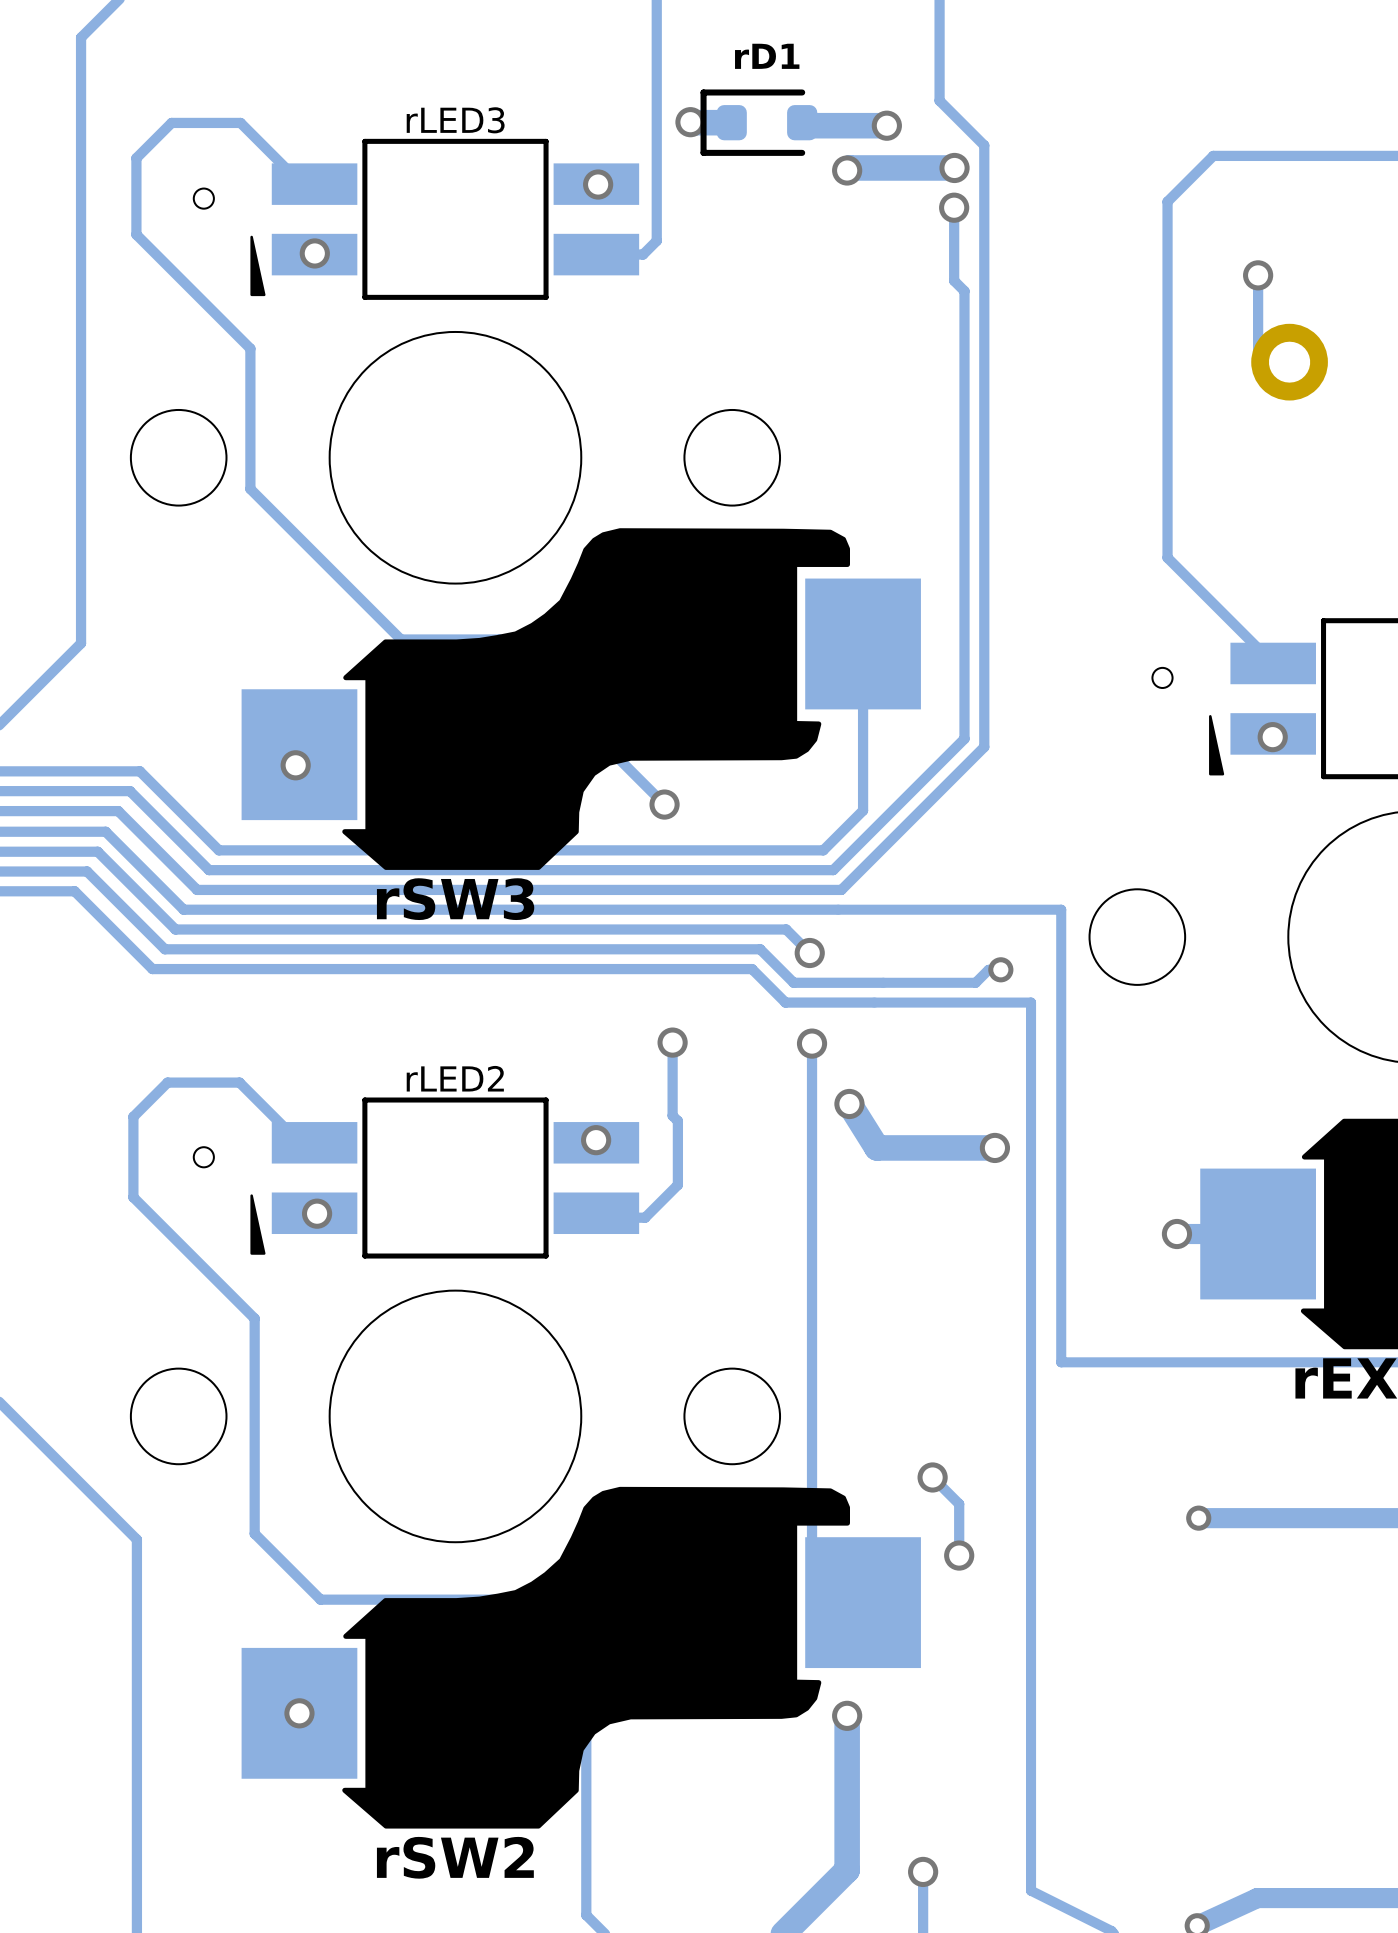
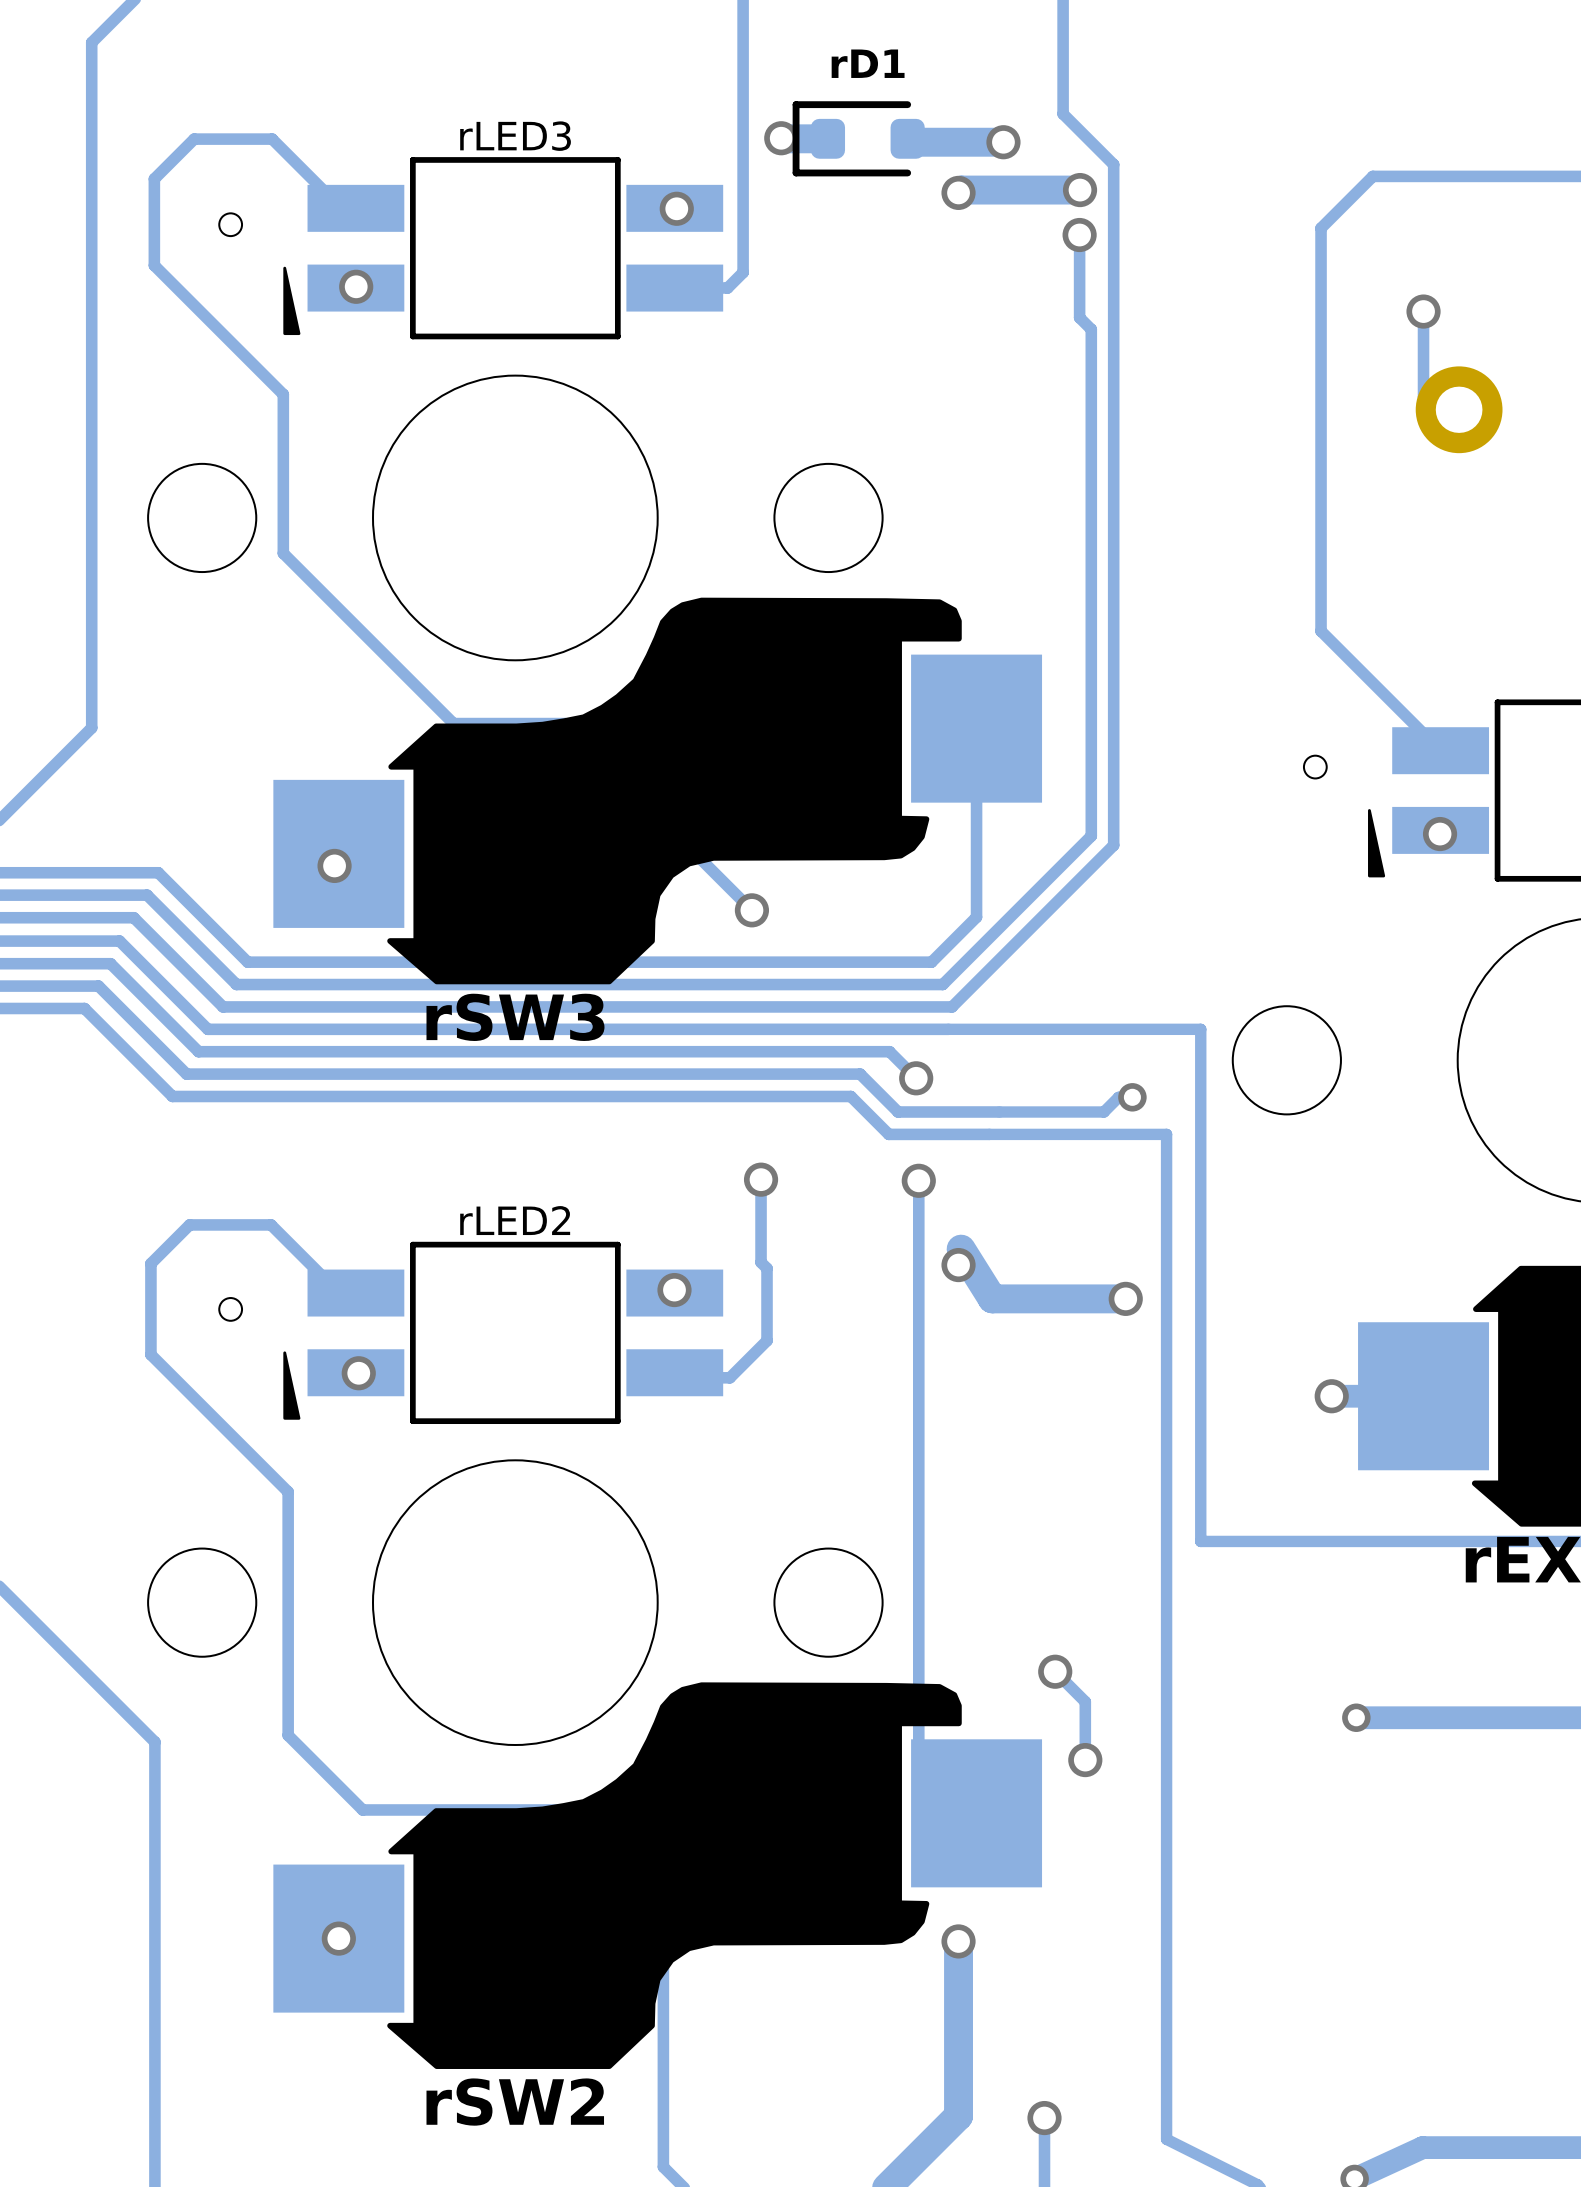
via position: (849, 1103) -> (958, 1265)

